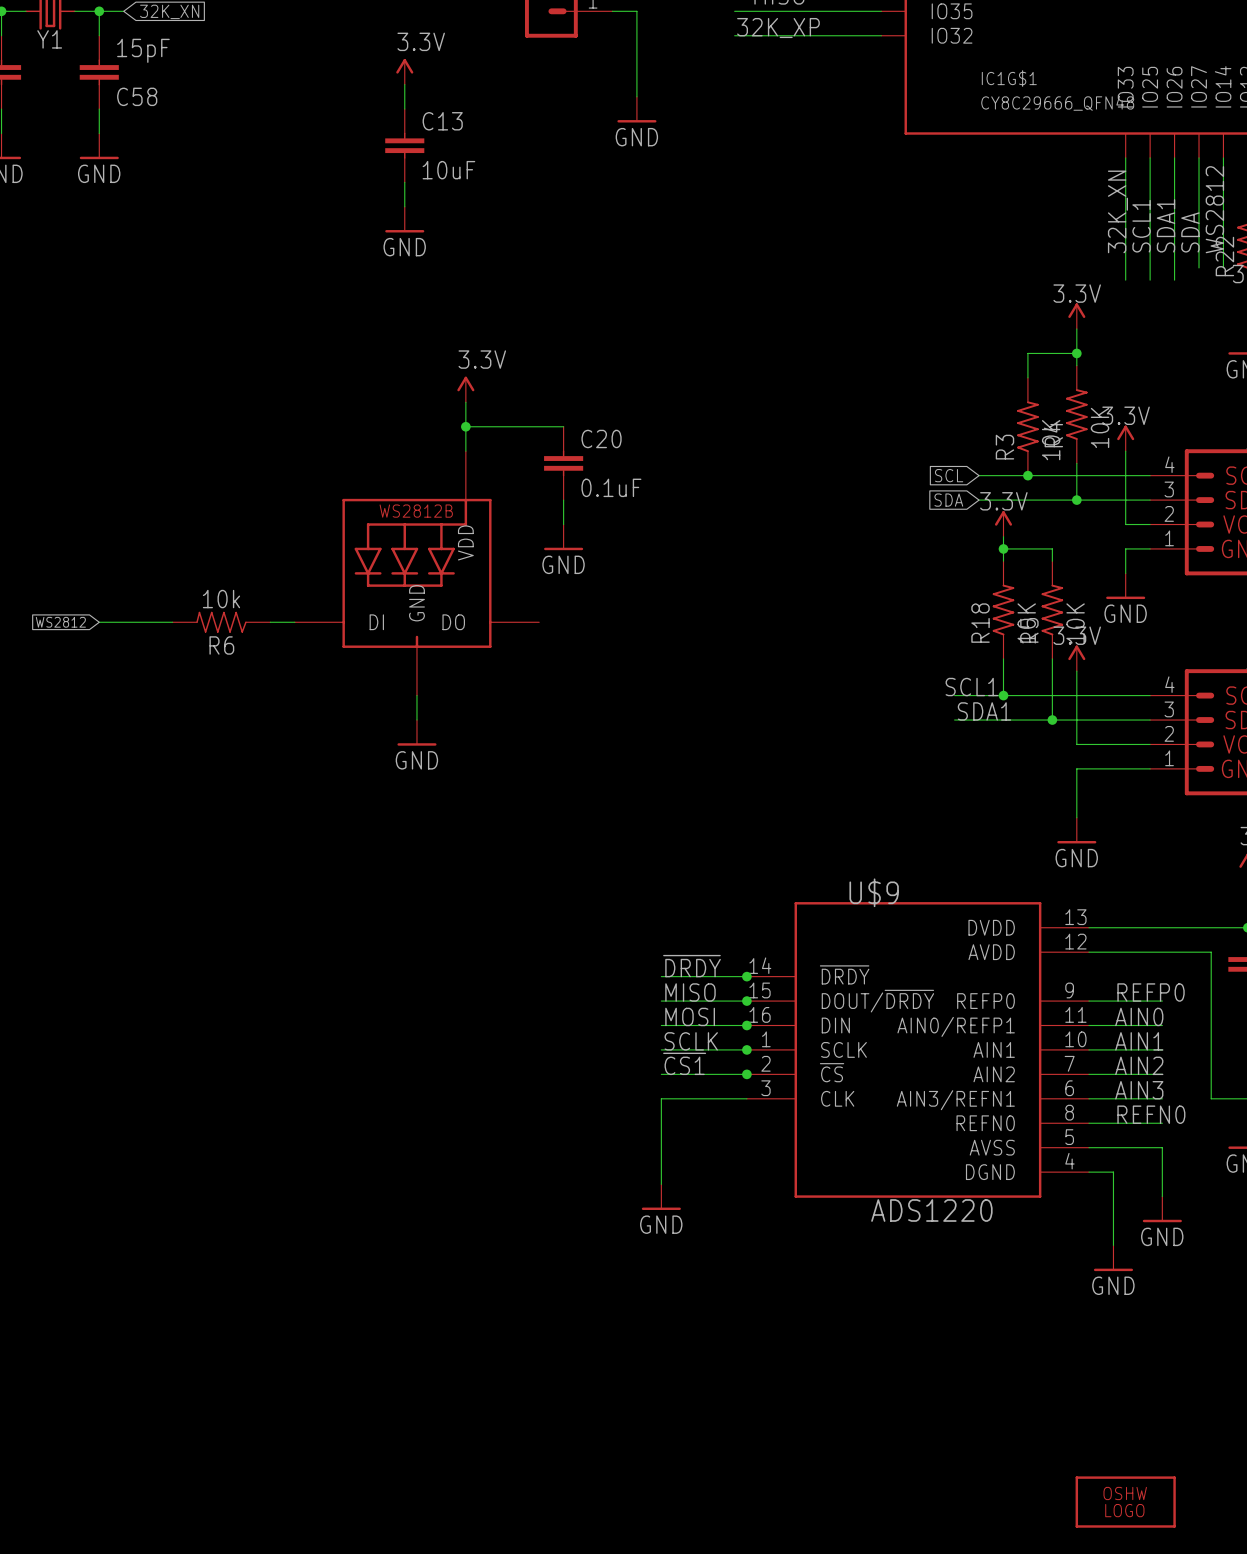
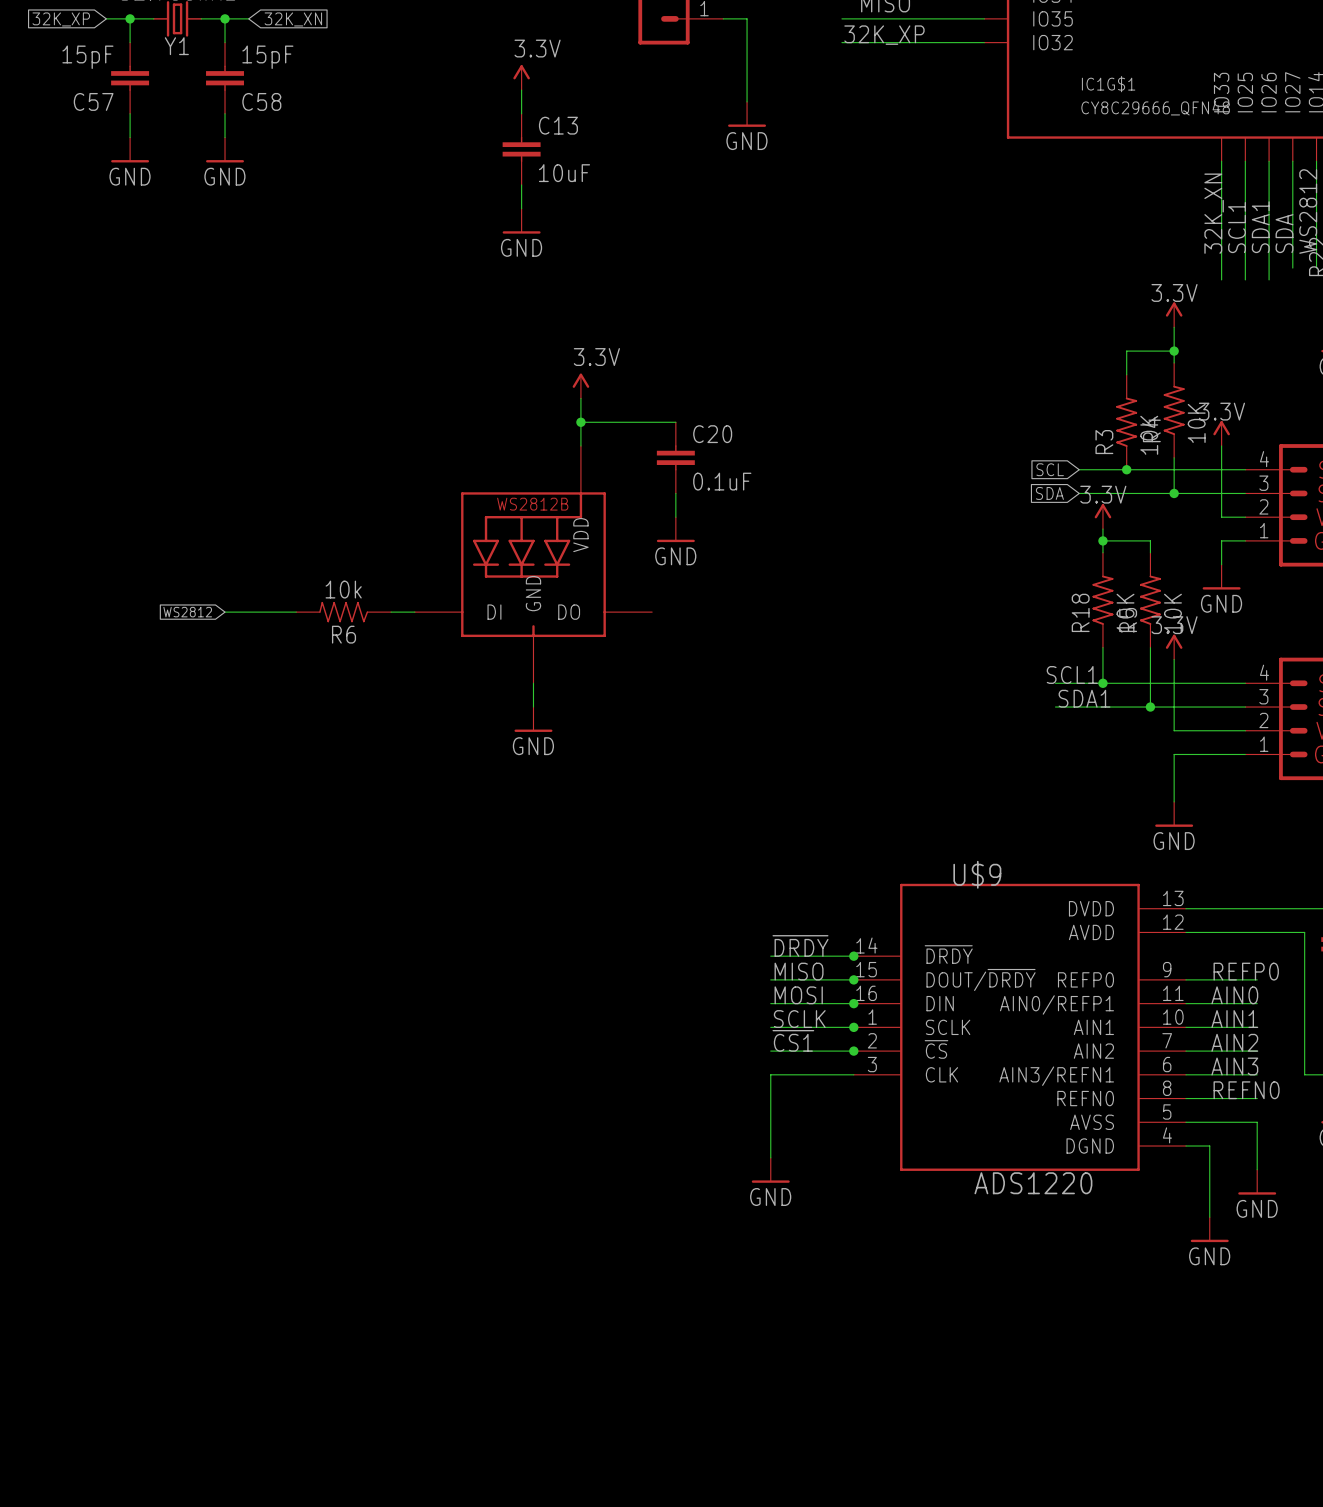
part: (1125, 1502) -> none

